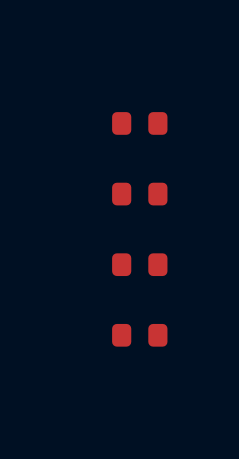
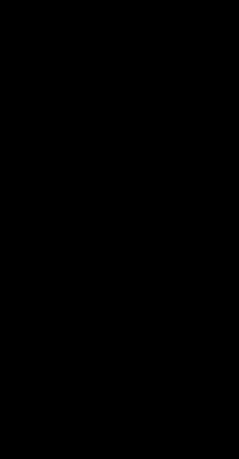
part: (139, 123) -> none
part: (139, 194) -> none
part: (139, 264) -> none
part: (139, 335) -> none

